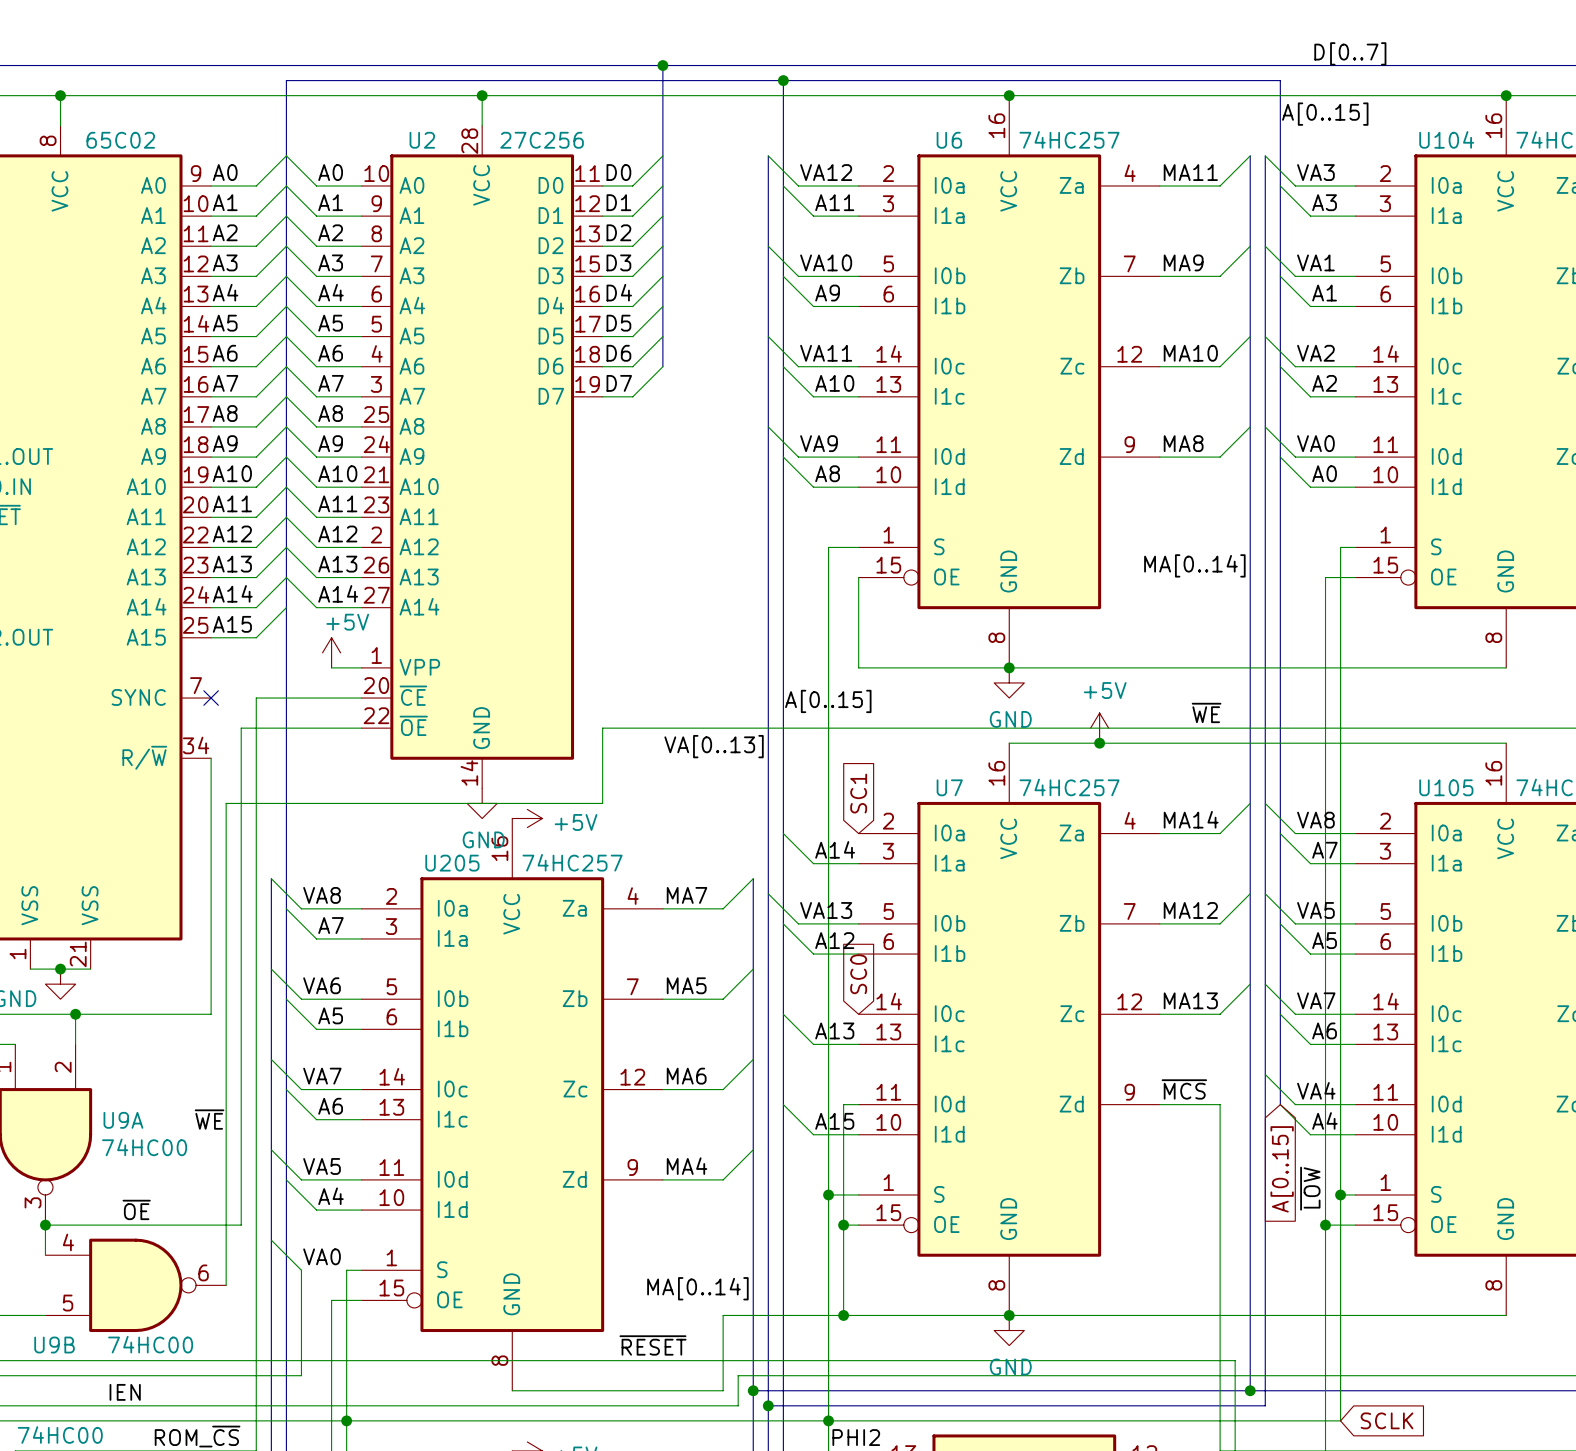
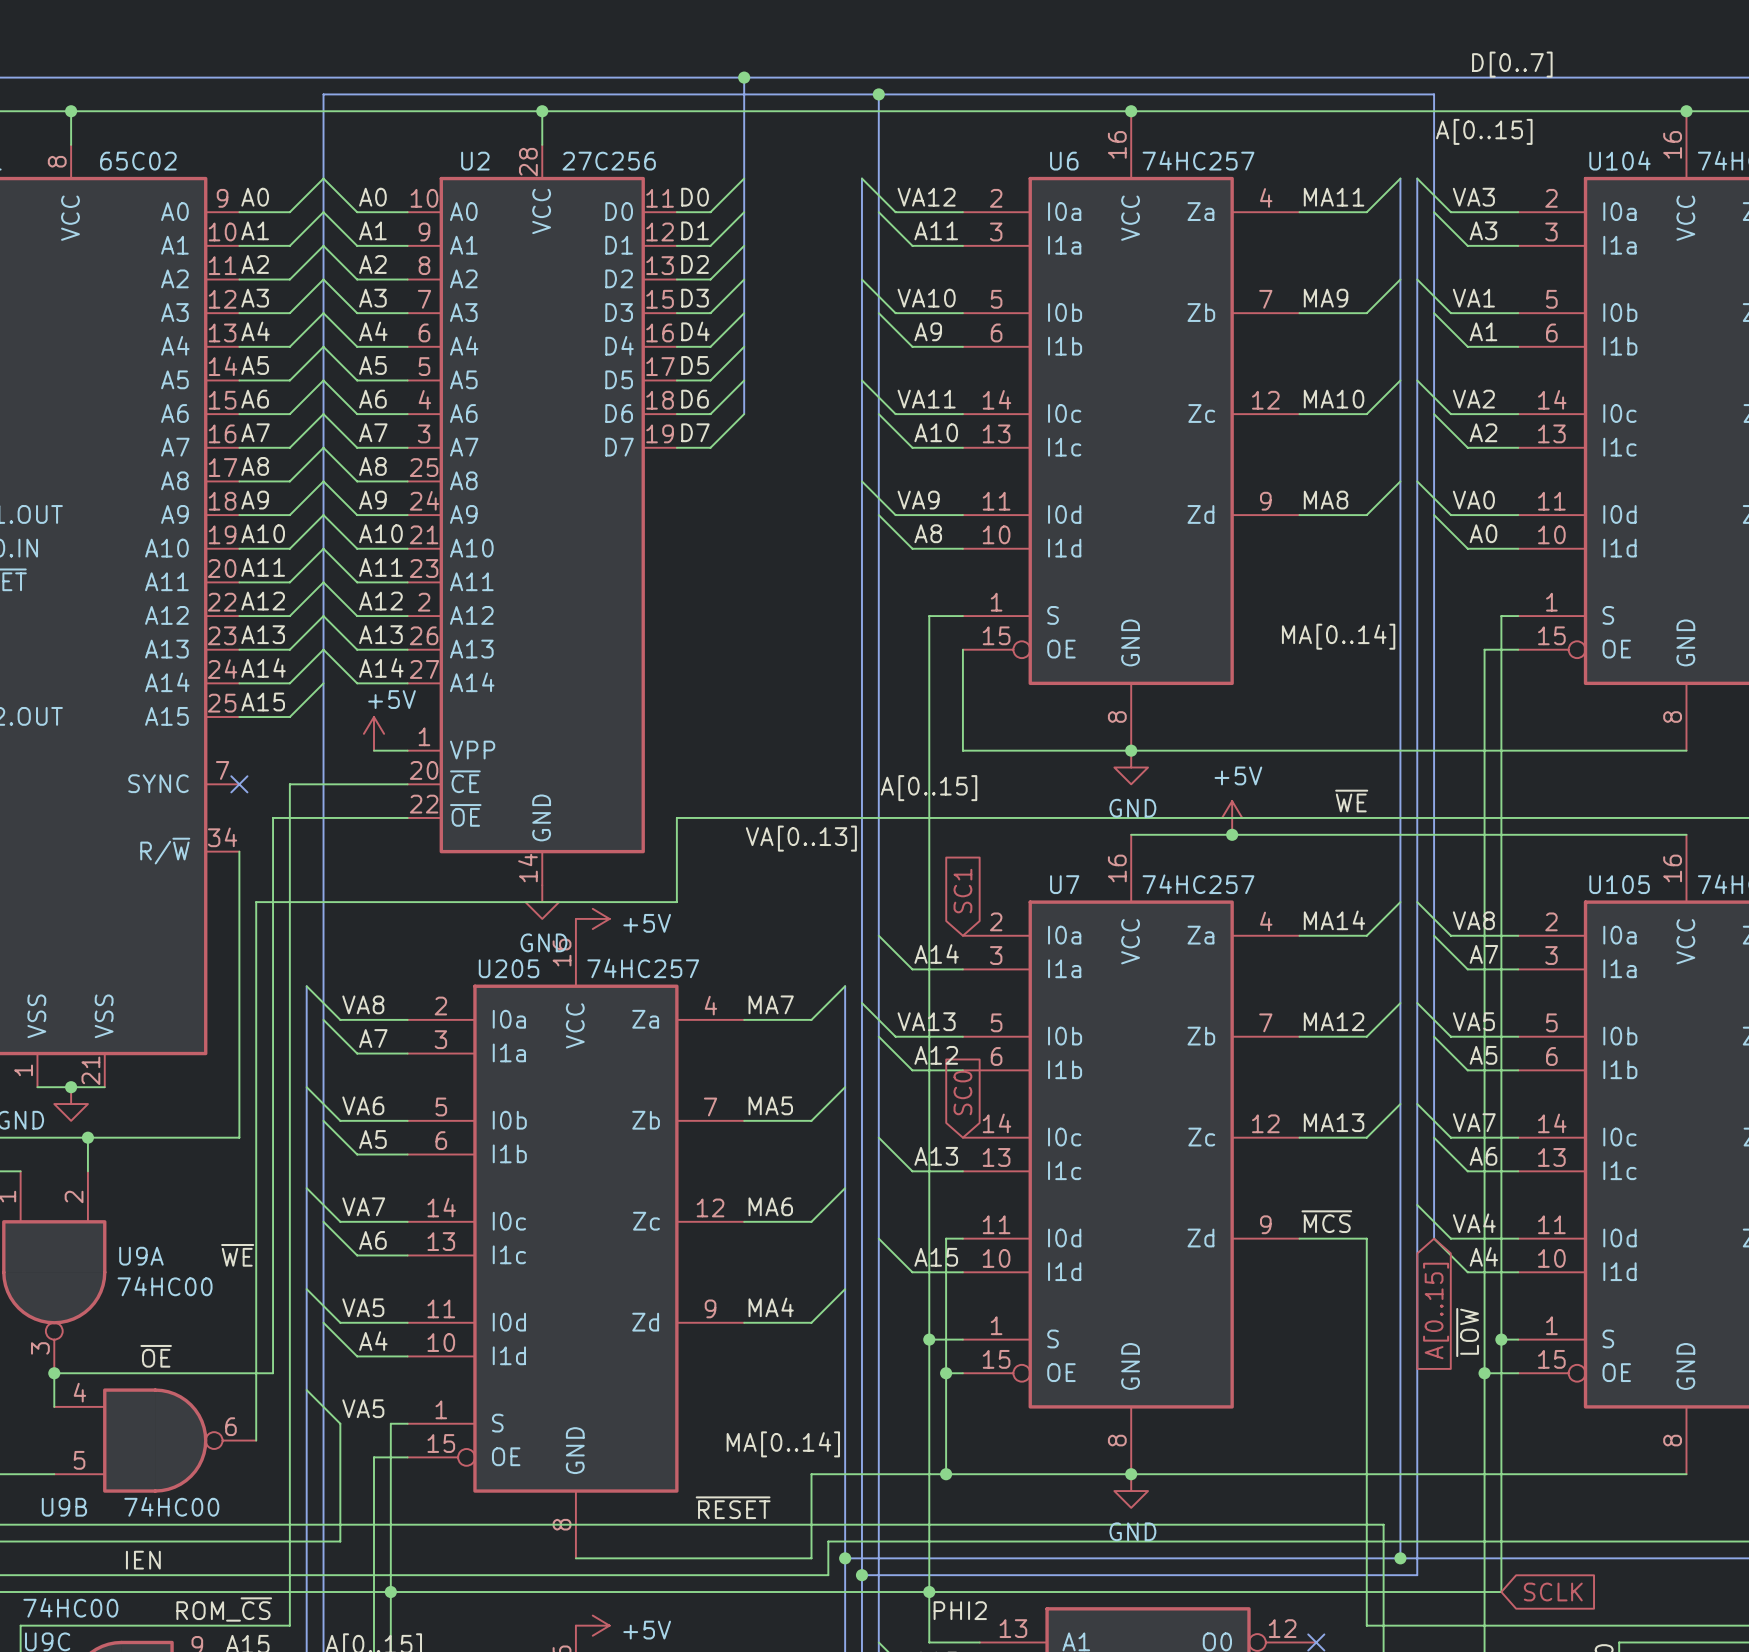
label: VA0 (322, 1256) -> VA5 (363, 1408)

